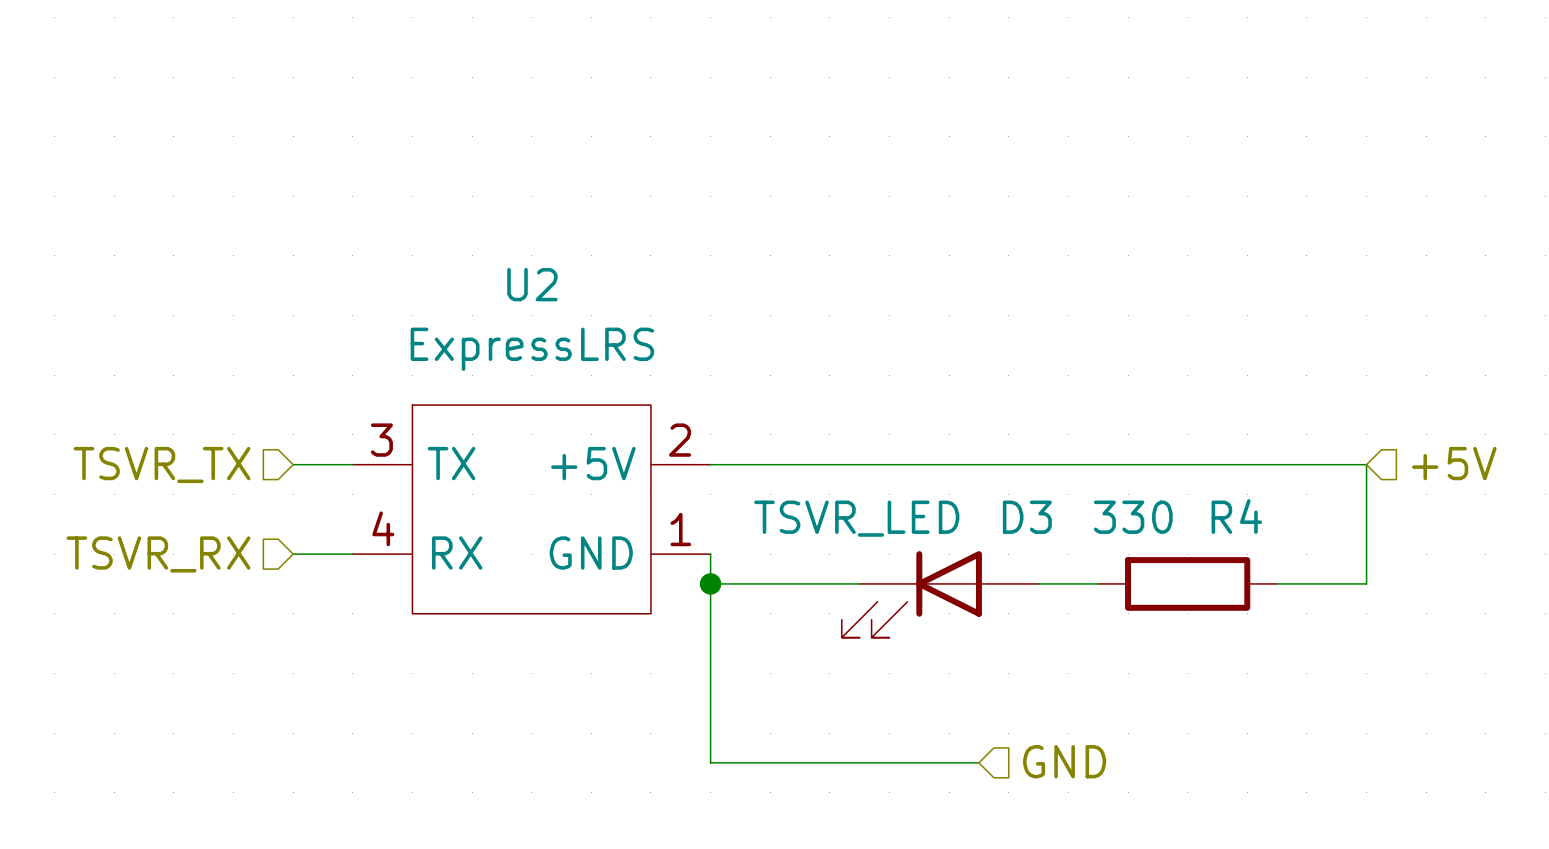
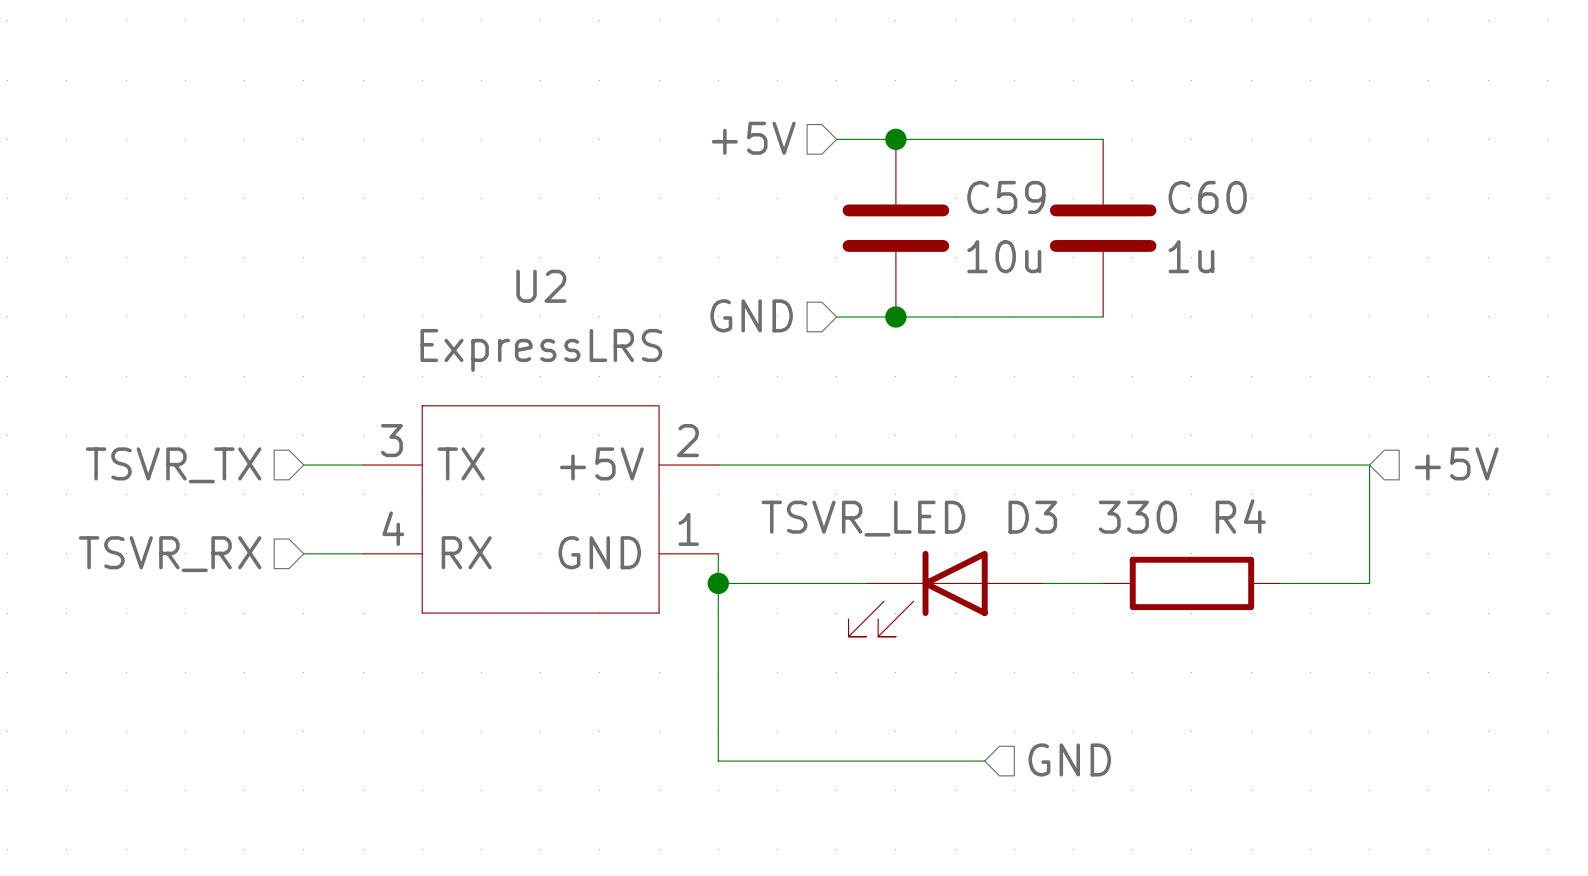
hierarchical label: none -> +5V (753, 138)
wire: none -> (836, 139) (1103, 139)
junction: none -> (895, 139)
C59: none -> 10u (895, 228)
C60: none -> 1u (1103, 228)
hierarchical label: none -> GND (751, 315)
wire: none -> (836, 316) (1103, 316)
junction: none -> (895, 316)

